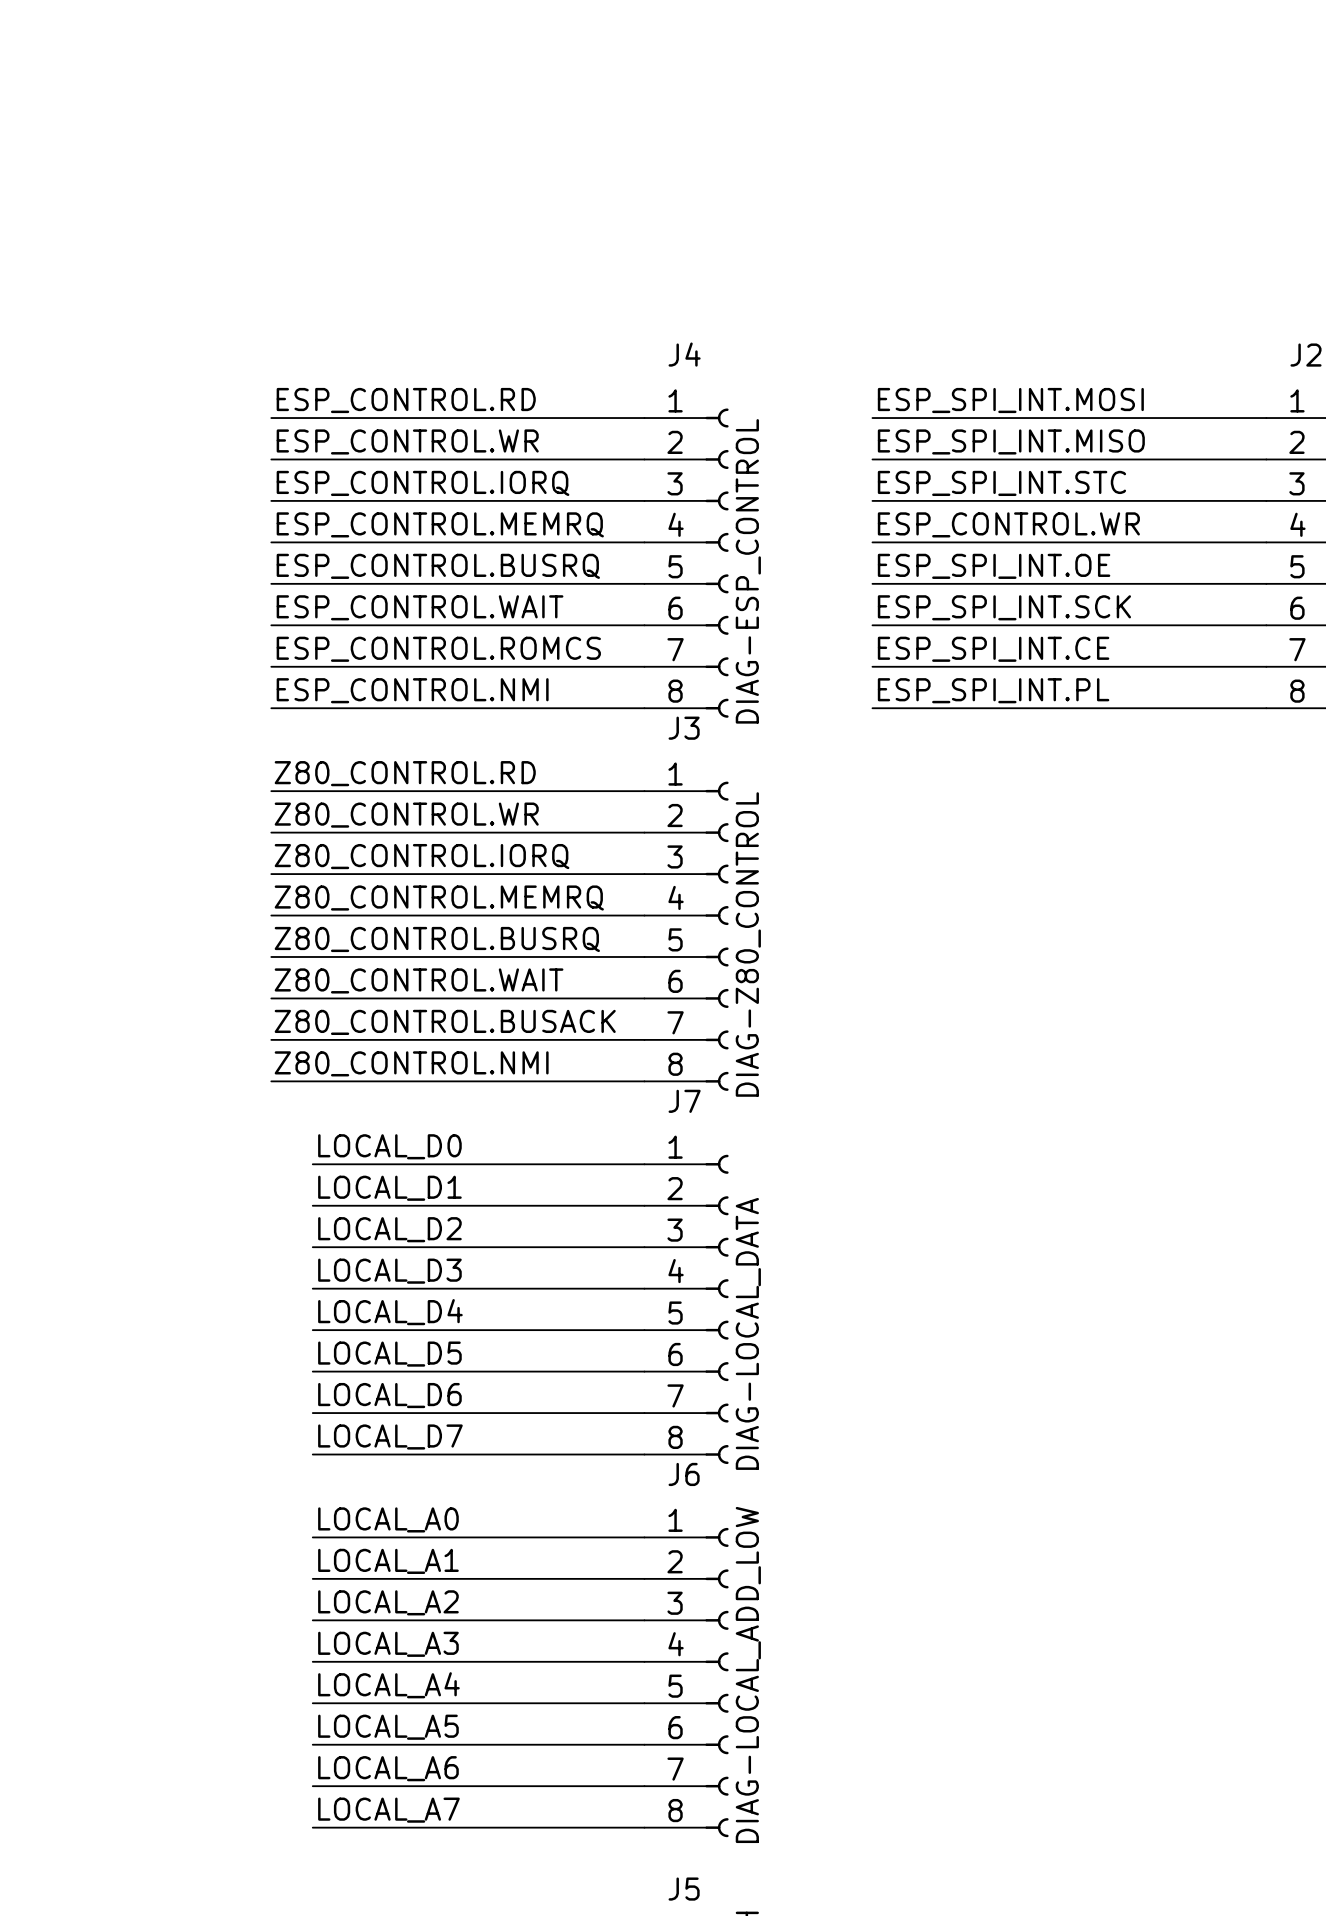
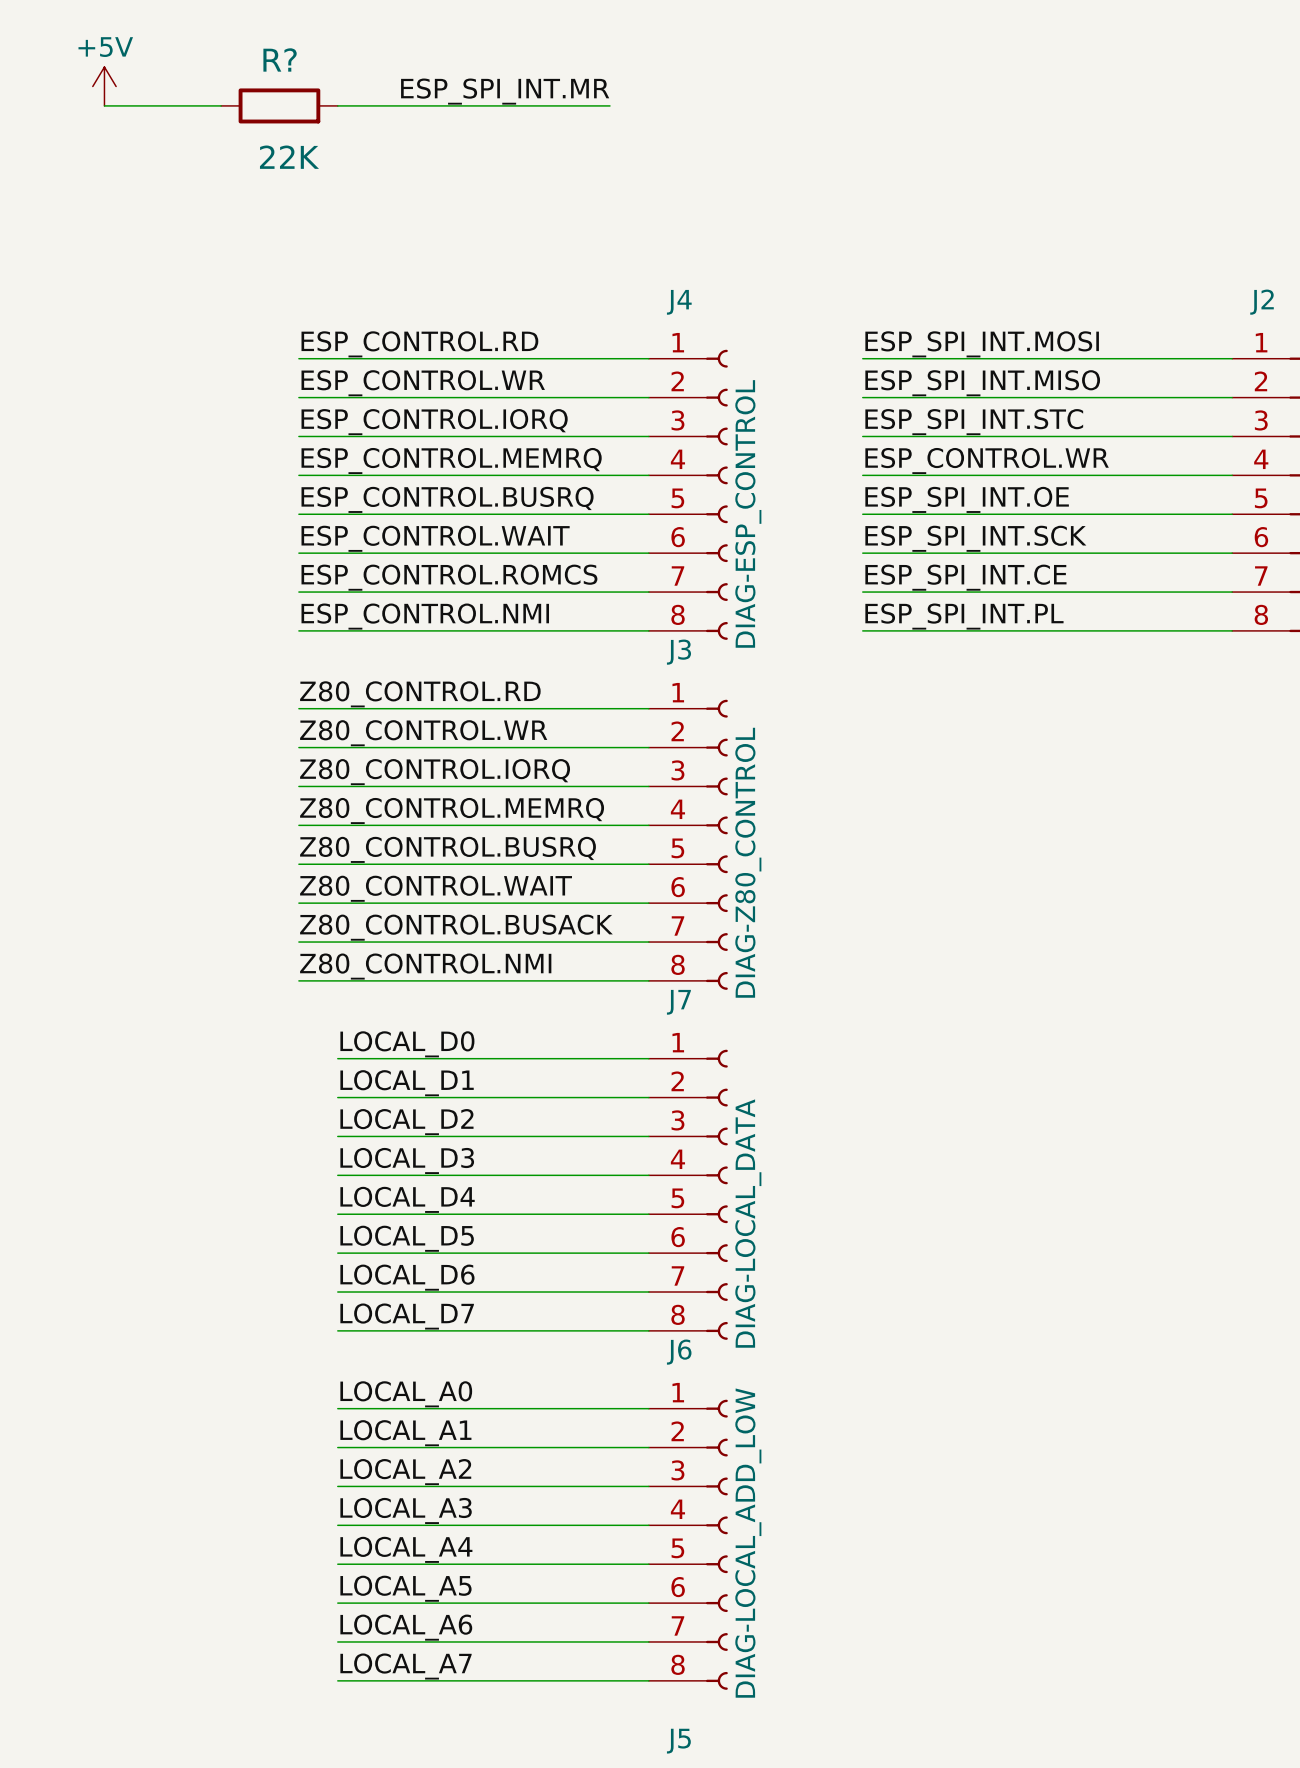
power symbol: none -> +5V (104, 86)
label: none -> ESP_SPI_INT.MR (505, 91)
wire: none -> (104, 105) (221, 105)
R?: none -> 22K (279, 105)
wire: none -> (337, 105) (609, 105)

